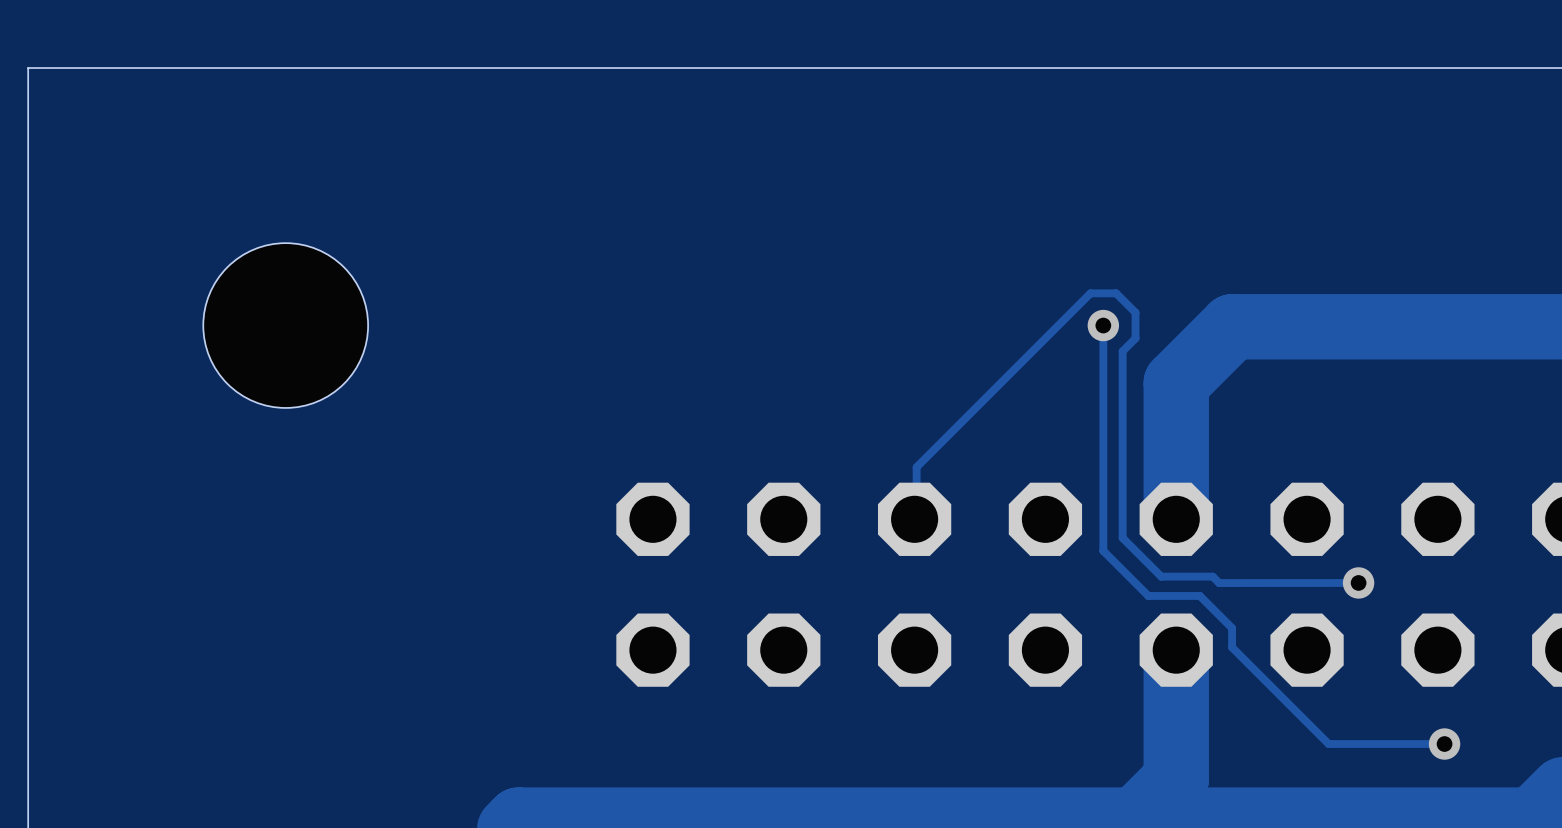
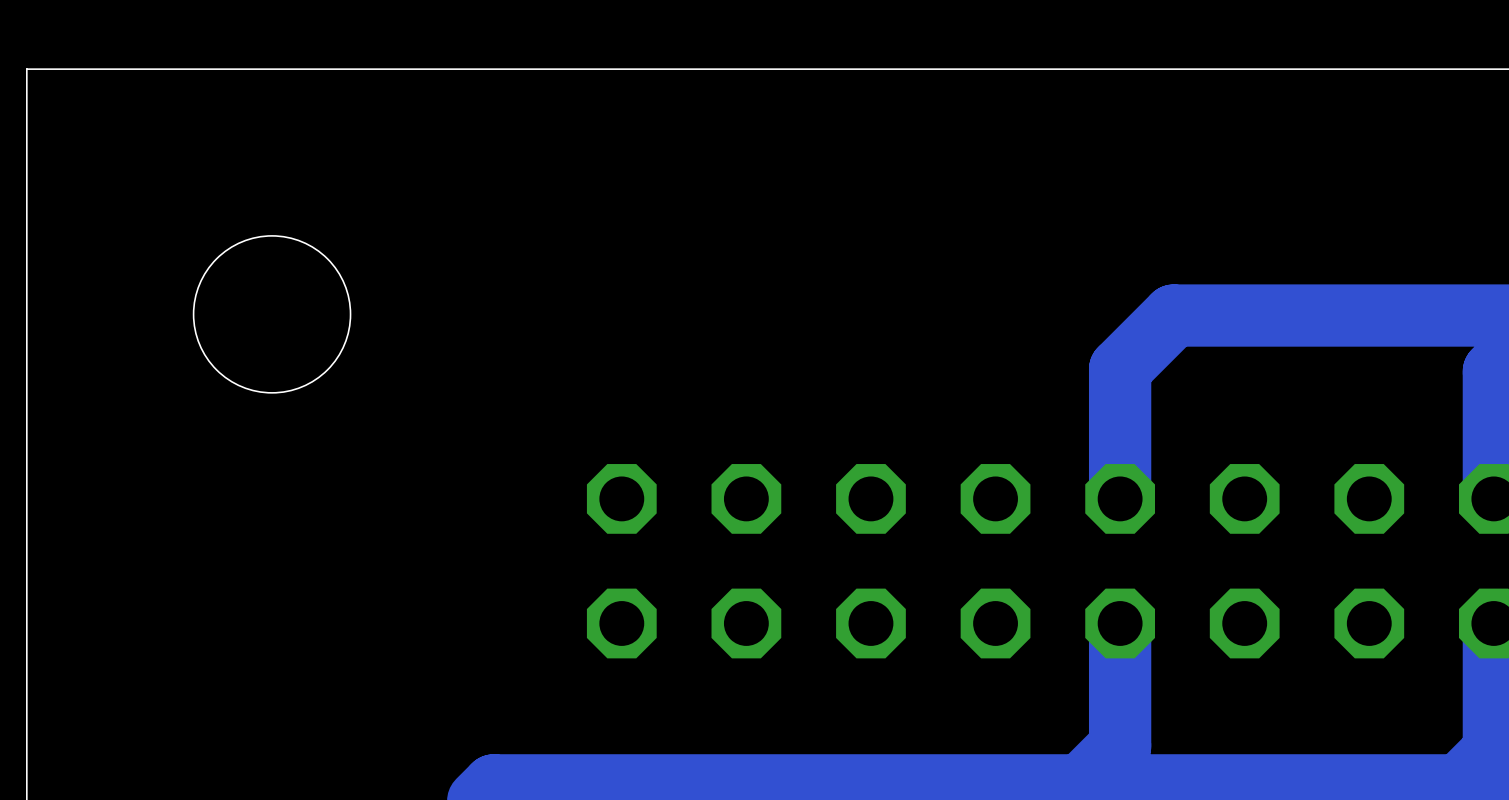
track: (1103, 325) (1103, 550) (1148, 595) (1199, 595) (1232, 628) (1232, 647) (1328, 744) (1444, 744) -> none
via: (1103, 325) -> none
track: (914, 519) (916, 518) (916, 467) (1090, 293) (1116, 293) (1135, 312) (1135, 338) (1122, 351) (1122, 538) (1161, 576) (1212, 576) (1219, 583) (1358, 582) -> none
via: (1358, 582) -> none
via: (1444, 744) -> none

